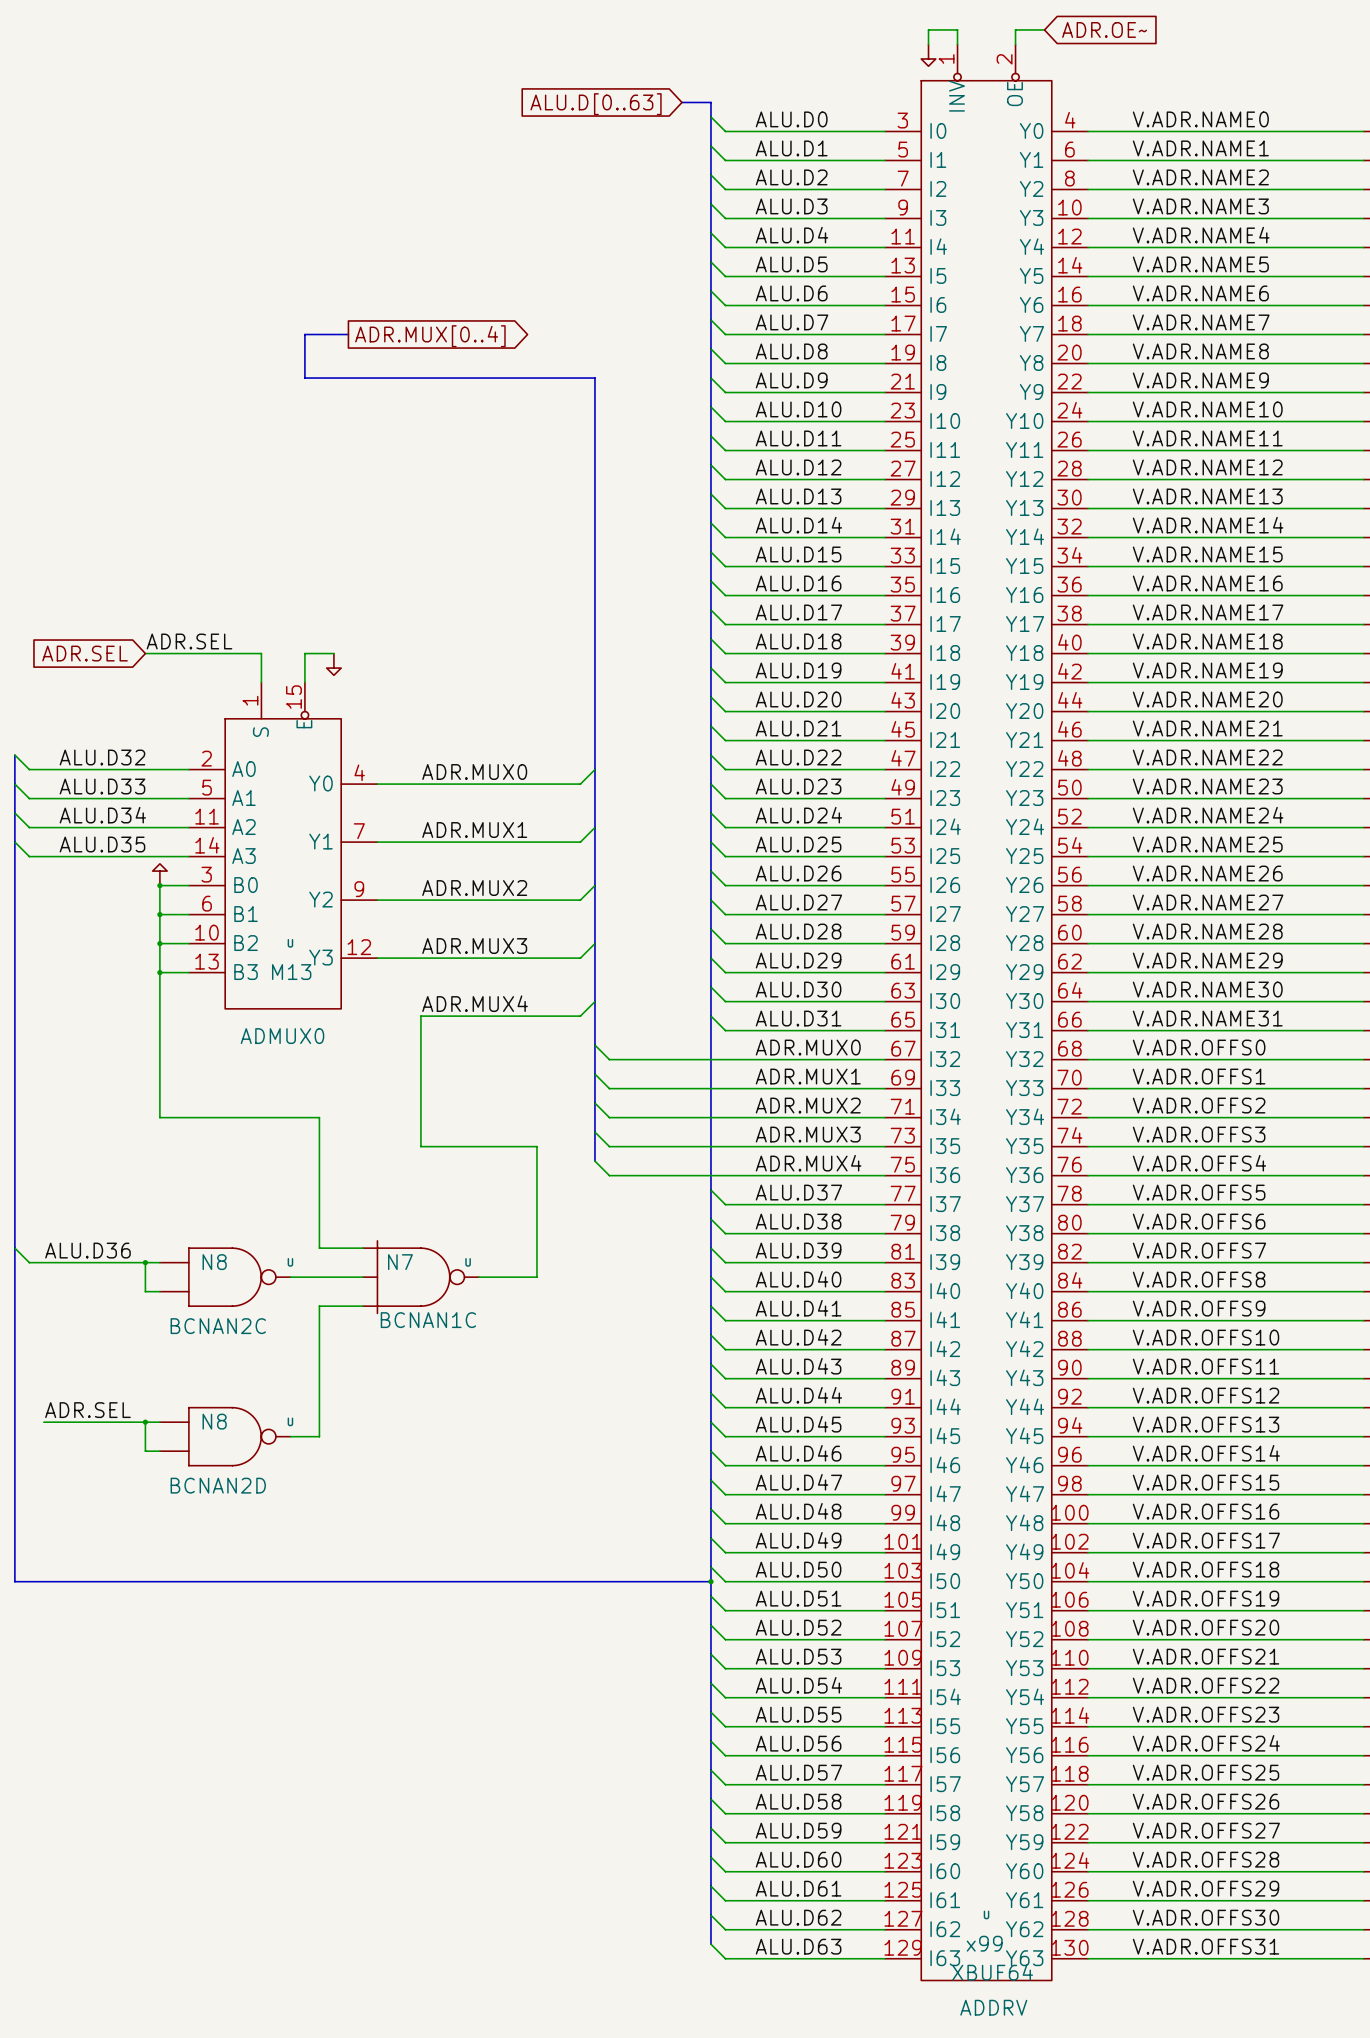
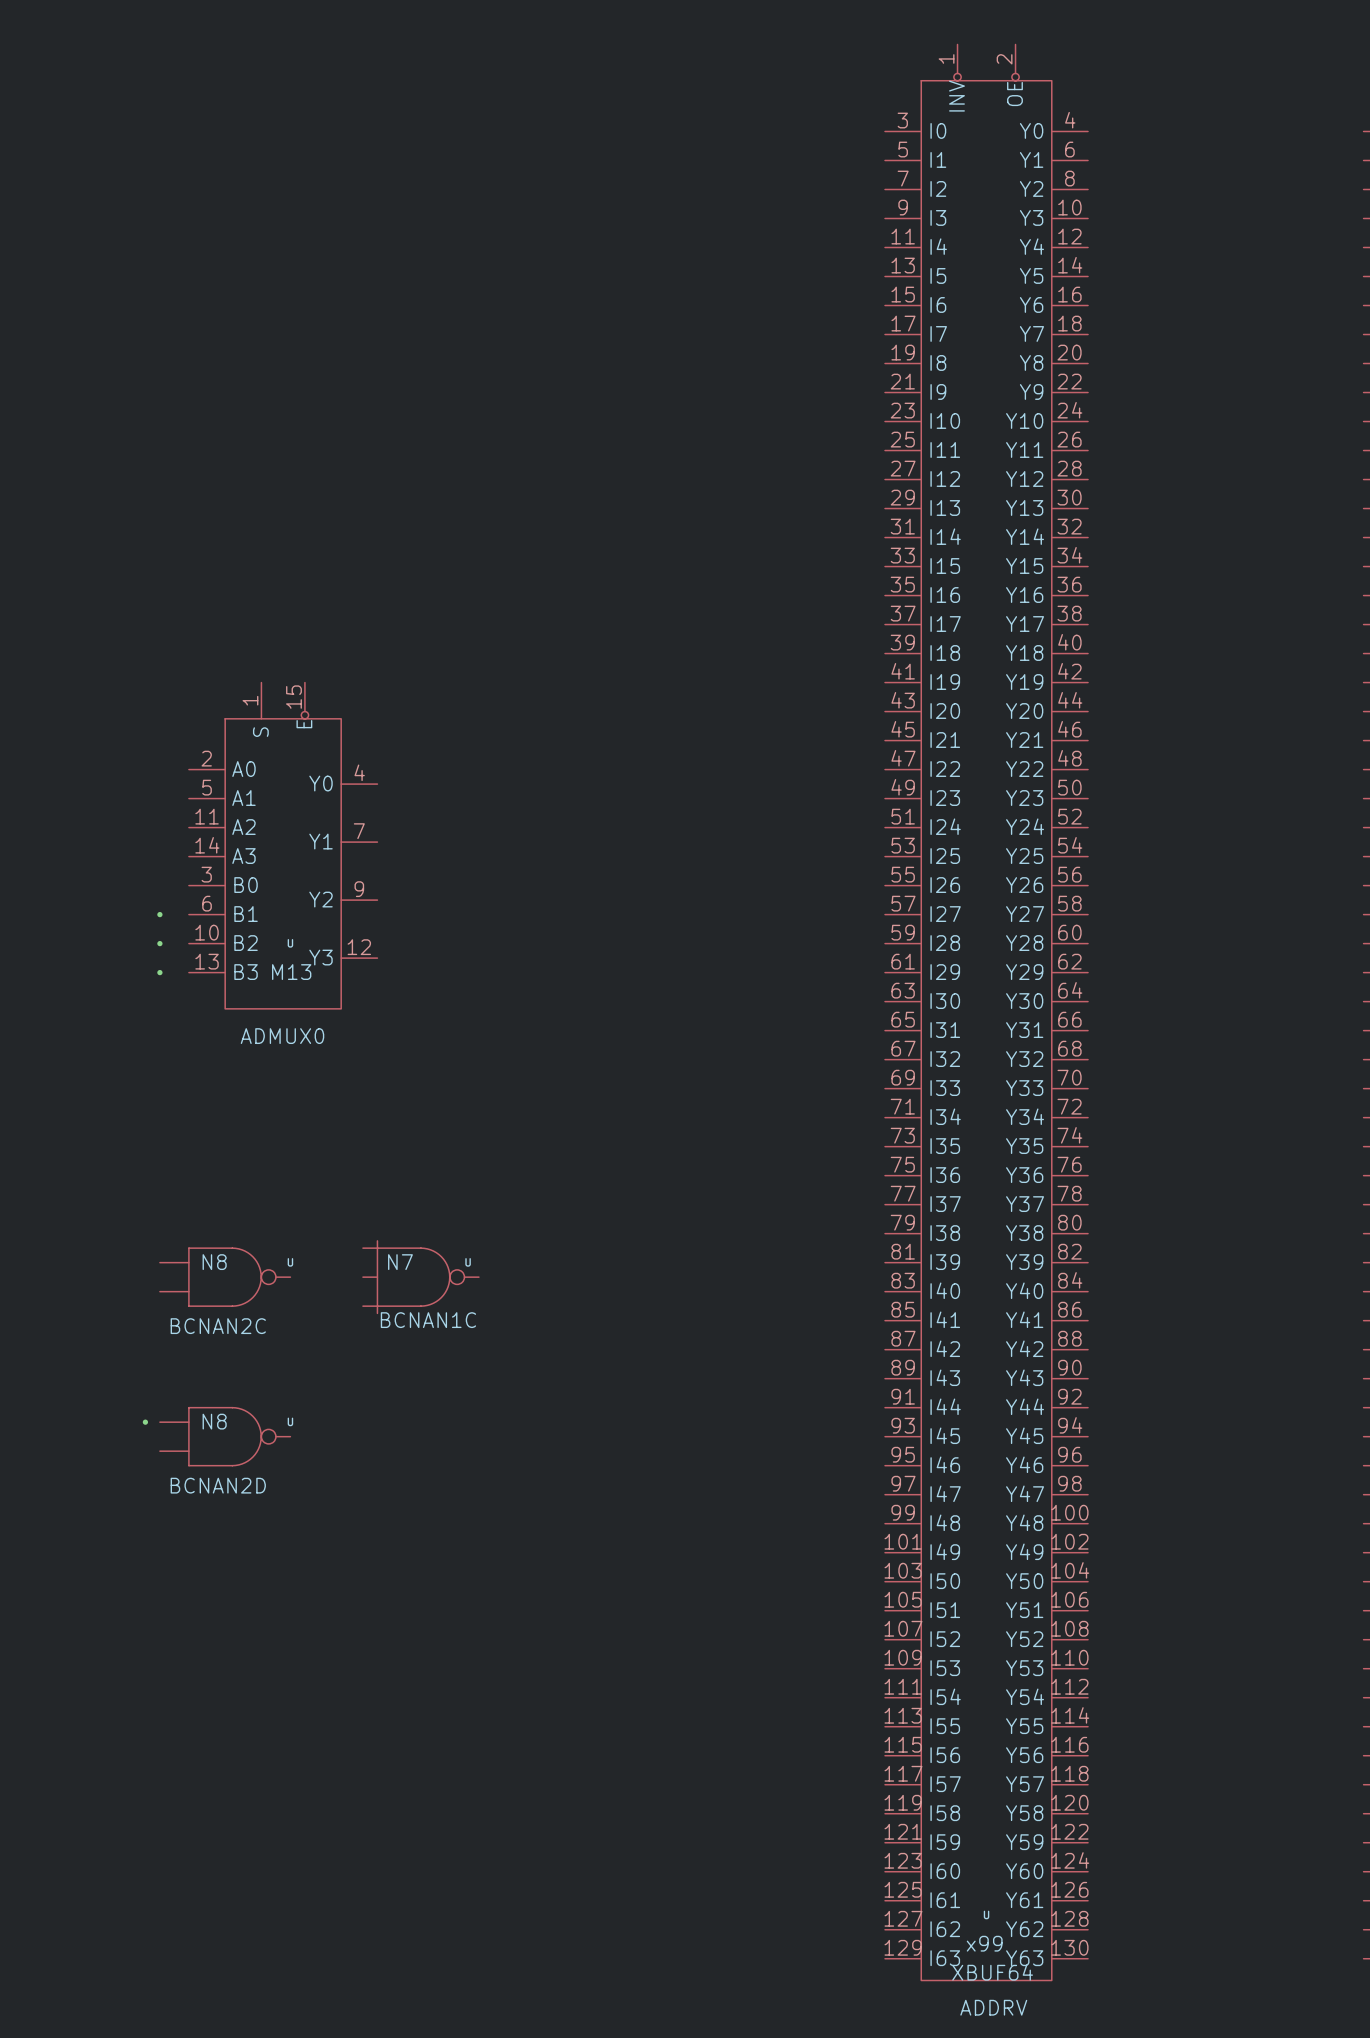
wire: (1044, 29) (1015, 29) (1015, 44) -> none
global label: ADR.OE~ (1104, 29) -> none
wire: (928, 44) (928, 29) (957, 29) (957, 44) -> none
power symbol: (928, 55) -> none
bus: (681, 102) (710, 102) (710, 1944) -> none
global label: ALU.D[0..63] (596, 104) -> none
wire: (710, 116) (725, 131) (885, 131) -> none
label: ALU.D0 (791, 119) -> none
label: V.ADR.NAME0 (1200, 119) -> none
wire: (1088, 131) (1363, 131) -> none
wire: (710, 145) (725, 160) (885, 160) -> none
label: ALU.D1 (791, 148) -> none
label: V.ADR.NAME1 (1200, 148) -> none
wire: (1088, 160) (1363, 160) -> none
wire: (710, 174) (725, 189) (885, 189) -> none
label: ALU.D2 (791, 177) -> none
label: V.ADR.NAME2 (1200, 177) -> none
wire: (1088, 189) (1363, 189) -> none
wire: (710, 204) (725, 218) (885, 218) -> none
label: ALU.D3 (791, 206) -> none
label: V.ADR.NAME3 (1200, 206) -> none
wire: (1088, 218) (1363, 218) -> none
wire: (710, 233) (725, 247) (885, 247) -> none
label: ALU.D4 (792, 235) -> none
label: V.ADR.NAME4 (1201, 235) -> none
wire: (1088, 247) (1363, 247) -> none
wire: (710, 262) (725, 276) (885, 276) -> none
label: ALU.D5 (791, 264) -> none
label: V.ADR.NAME5 (1200, 264) -> none
wire: (1088, 276) (1363, 276) -> none
wire: (710, 291) (725, 305) (885, 305) -> none
label: ALU.D6 (791, 293) -> none
label: V.ADR.NAME6 (1200, 293) -> none
wire: (1088, 305) (1363, 305) -> none
wire: (710, 320) (725, 334) (885, 334) -> none
label: ALU.D7 (792, 322) -> none
label: V.ADR.NAME7 (1201, 322) -> none
bus: (348, 334) (304, 334) (304, 378) (594, 378) (594, 1161) -> none
wire: (1088, 334) (1363, 334) -> none
global label: ADR.MUX[0..4] (430, 336) -> none
wire: (710, 349) (725, 363) (885, 363) -> none
label: ALU.D8 (791, 351) -> none
label: V.ADR.NAME8 (1200, 351) -> none
wire: (1088, 363) (1363, 363) -> none
wire: (710, 378) (725, 392) (885, 392) -> none
label: ALU.D9 (791, 380) -> none
label: V.ADR.NAME9 (1200, 380) -> none
wire: (1088, 392) (1363, 392) -> none
wire: (710, 407) (725, 421) (885, 421) -> none
label: ALU.D10 (798, 409) -> none
label: V.ADR.NAME10 (1207, 409) -> none
wire: (1088, 421) (1363, 421) -> none
wire: (710, 436) (725, 450) (885, 450) -> none
label: ALU.D11 (798, 438) -> none
label: V.ADR.NAME11 (1207, 438) -> none
wire: (1088, 450) (1363, 450) -> none
wire: (710, 465) (725, 479) (885, 479) -> none
label: ALU.D12 (798, 467) -> none
label: V.ADR.NAME12 (1207, 467) -> none
wire: (1088, 479) (1363, 479) -> none
wire: (710, 494) (725, 508) (885, 508) -> none
label: ALU.D13 (798, 496) -> none
label: V.ADR.NAME13 (1207, 496) -> none
wire: (1088, 508) (1363, 508) -> none
wire: (710, 523) (725, 537) (885, 537) -> none
label: ALU.D14 (798, 525) -> none
label: V.ADR.NAME14 (1208, 525) -> none
wire: (1088, 537) (1363, 537) -> none
wire: (710, 552) (725, 566) (885, 566) -> none
label: ALU.D15 (798, 554) -> none
label: V.ADR.NAME15 (1207, 554) -> none
wire: (1088, 566) (1363, 566) -> none
wire: (710, 581) (725, 595) (885, 595) -> none
label: ALU.D16 (798, 583) -> none
label: V.ADR.NAME16 (1207, 583) -> none
wire: (1088, 595) (1363, 595) -> none
wire: (710, 610) (725, 624) (885, 624) -> none
label: ALU.D17 (798, 612) -> none
label: V.ADR.NAME17 (1208, 612) -> none
wire: (1088, 624) (1363, 624) -> none
wire: (710, 639) (725, 653) (885, 653) -> none
label: ADR.SEL (189, 641) -> none
label: ALU.D18 (798, 641) -> none
label: V.ADR.NAME18 (1207, 641) -> none
global label: ADR.SEL (85, 653) -> none
wire: (145, 653) (261, 653) (261, 682) -> none
wire: (333, 653) (304, 653) (304, 682) -> none
wire: (1088, 653) (1363, 653) -> none
power symbol: (333, 664) -> none
wire: (710, 668) (725, 682) (885, 682) -> none
label: ALU.D19 (798, 670) -> none
label: V.ADR.NAME19 (1207, 670) -> none
wire: (1088, 682) (1363, 682) -> none
wire: (710, 697) (725, 711) (885, 711) -> none
label: ALU.D20 (798, 699) -> none
label: V.ADR.NAME20 (1207, 699) -> none
wire: (1088, 711) (1363, 711) -> none
wire: (710, 726) (725, 740) (885, 740) -> none
label: ALU.D21 (798, 728) -> none
label: V.ADR.NAME21 (1207, 728) -> none
wire: (1088, 740) (1363, 740) -> none
wire: (14, 755) (29, 769) (188, 769) -> none
bus: (14, 755) (14, 1581) (710, 1581) -> none
wire: (710, 755) (725, 769) (885, 769) -> none
label: ALU.D32 (102, 757) -> none
label: ALU.D22 (798, 757) -> none
label: V.ADR.NAME22 (1207, 757) -> none
wire: (594, 769) (580, 784) (377, 784) -> none
wire: (1088, 769) (1363, 769) -> none
label: ADR.MUX0 (474, 772) -> none
wire: (14, 784) (29, 798) (188, 798) -> none
wire: (710, 784) (725, 798) (885, 798) -> none
label: ALU.D33 (102, 786) -> none
label: ALU.D23 (798, 786) -> none
label: V.ADR.NAME23 (1207, 786) -> none
wire: (1088, 798) (1363, 798) -> none
wire: (14, 813) (29, 827) (188, 827) -> none
wire: (710, 813) (725, 827) (885, 827) -> none
label: ALU.D34 (102, 815) -> none
label: ALU.D24 (798, 815) -> none
label: V.ADR.NAME24 (1208, 815) -> none
wire: (594, 827) (580, 842) (377, 842) -> none
wire: (1088, 827) (1363, 827) -> none
label: ADR.MUX1 (474, 830) -> none
wire: (14, 842) (29, 856) (188, 856) -> none
wire: (710, 842) (725, 856) (885, 856) -> none
label: ALU.D35 (102, 844) -> none
label: ALU.D25 (798, 844) -> none
label: V.ADR.NAME25 (1207, 844) -> none
wire: (1088, 856) (1363, 856) -> none
wire: (710, 871) (725, 885) (885, 885) -> none
label: ALU.D26 (798, 873) -> none
label: V.ADR.NAME26 (1207, 873) -> none
power symbol: (159, 874) -> none
junction: (159, 885) -> none
wire: (188, 885) (159, 885) (159, 1117) (319, 1117) (319, 1248) (362, 1248) -> none
wire: (594, 885) (580, 900) (377, 900) -> none
wire: (1088, 885) (1363, 885) -> none
label: ADR.MUX2 (474, 888) -> none
wire: (710, 900) (725, 914) (885, 914) -> none
label: ALU.D27 (798, 902) -> none
label: V.ADR.NAME27 (1208, 902) -> none
wire: (159, 914) (188, 914) -> none
wire: (1088, 914) (1363, 914) -> none
wire: (710, 929) (725, 943) (885, 943) -> none
label: ALU.D28 (798, 931) -> none
label: V.ADR.NAME28 (1207, 931) -> none
wire: (159, 943) (188, 943) -> none
wire: (594, 943) (580, 958) (377, 958) -> none
wire: (1088, 943) (1363, 943) -> none
label: ADR.MUX3 (474, 946) -> none
wire: (710, 958) (725, 972) (885, 972) -> none
label: ALU.D29 (798, 960) -> none
label: V.ADR.NAME29 (1207, 960) -> none
wire: (159, 972) (188, 972) -> none
wire: (1088, 972) (1363, 972) -> none
wire: (710, 987) (725, 1001) (885, 1001) -> none
label: ALU.D30 (798, 989) -> none
label: V.ADR.NAME30 (1207, 989) -> none
wire: (594, 1001) (580, 1016) (420, 1016) (420, 1146) (536, 1146) (536, 1277) (478, 1277) -> none
wire: (1088, 1001) (1363, 1001) -> none
label: ADR.MUX4 (475, 1003) -> none
wire: (710, 1016) (725, 1030) (885, 1030) -> none
label: ALU.D31 (798, 1018) -> none
label: V.ADR.NAME31 (1207, 1018) -> none
wire: (1088, 1030) (1363, 1030) -> none
wire: (594, 1045) (609, 1059) (885, 1059) -> none
label: ADR.MUX0 (808, 1047) -> none
label: V.ADR.OFFS0 (1199, 1047) -> none
wire: (1088, 1059) (1363, 1059) -> none
wire: (594, 1074) (609, 1088) (885, 1088) -> none
label: ADR.MUX1 (808, 1076) -> none
label: V.ADR.OFFS1 (1199, 1076) -> none
wire: (1088, 1088) (1363, 1088) -> none
wire: (594, 1103) (609, 1117) (885, 1117) -> none
label: ADR.MUX2 (808, 1105) -> none
label: V.ADR.OFFS2 (1199, 1105) -> none
wire: (1088, 1117) (1363, 1117) -> none
wire: (594, 1132) (609, 1146) (885, 1146) -> none
label: ADR.MUX3 (808, 1134) -> none
label: V.ADR.OFFS3 (1199, 1134) -> none
wire: (1088, 1146) (1363, 1146) -> none
wire: (594, 1161) (609, 1175) (885, 1175) -> none
label: ADR.MUX4 (808, 1163) -> none
label: V.ADR.OFFS4 (1199, 1163) -> none
wire: (1088, 1175) (1363, 1175) -> none
wire: (710, 1190) (725, 1204) (885, 1204) -> none
label: ALU.D37 (798, 1192) -> none
label: V.ADR.OFFS5 (1199, 1192) -> none
wire: (1088, 1204) (1363, 1204) -> none
wire: (710, 1219) (725, 1233) (885, 1233) -> none
label: ALU.D38 (798, 1221) -> none
label: V.ADR.OFFS6 (1199, 1221) -> none
wire: (1088, 1233) (1363, 1233) -> none
wire: (14, 1248) (29, 1262) (159, 1262) -> none
wire: (710, 1248) (725, 1262) (885, 1262) -> none
label: ALU.D36 (87, 1250) -> none
label: ALU.D39 (798, 1250) -> none
label: V.ADR.OFFS7 (1199, 1250) -> none
wire: (145, 1262) (145, 1291) (159, 1291) -> none
junction: (145, 1262) -> none
wire: (1088, 1262) (1363, 1262) -> none
wire: (290, 1277) (362, 1277) -> none
wire: (710, 1277) (725, 1291) (885, 1291) -> none
label: ALU.D40 (798, 1279) -> none
label: V.ADR.OFFS8 (1199, 1279) -> none
wire: (1088, 1291) (1363, 1291) -> none
wire: (362, 1306) (319, 1306) (319, 1436) (290, 1436) -> none
wire: (710, 1306) (725, 1320) (885, 1320) -> none
label: ALU.D41 (798, 1308) -> none
label: V.ADR.OFFS9 (1199, 1308) -> none
wire: (1088, 1320) (1363, 1320) -> none
wire: (710, 1335) (725, 1349) (885, 1349) -> none
label: ALU.D42 (798, 1337) -> none
label: V.ADR.OFFS10 (1206, 1337) -> none
wire: (1088, 1349) (1363, 1349) -> none
wire: (710, 1364) (725, 1378) (885, 1378) -> none
label: ALU.D43 (798, 1366) -> none
label: V.ADR.OFFS11 (1206, 1366) -> none
wire: (1088, 1378) (1363, 1378) -> none
wire: (710, 1393) (725, 1407) (885, 1407) -> none
label: ALU.D44 (798, 1395) -> none
label: V.ADR.OFFS12 (1206, 1395) -> none
wire: (1088, 1407) (1363, 1407) -> none
label: ADR.SEL (87, 1410) -> none
wire: (43, 1422) (159, 1422) -> none
wire: (145, 1422) (145, 1451) (159, 1451) -> none
wire: (710, 1422) (725, 1436) (885, 1436) -> none
label: ALU.D45 (798, 1424) -> none
label: V.ADR.OFFS13 (1206, 1424) -> none
wire: (1088, 1436) (1363, 1436) -> none
wire: (710, 1451) (725, 1465) (885, 1465) -> none
label: ALU.D46 (798, 1453) -> none
label: V.ADR.OFFS14 (1206, 1453) -> none
wire: (1088, 1465) (1363, 1465) -> none
wire: (710, 1480) (725, 1494) (885, 1494) -> none
label: ALU.D47 (798, 1482) -> none
label: V.ADR.OFFS15 (1206, 1482) -> none
wire: (1088, 1494) (1363, 1494) -> none
wire: (710, 1509) (725, 1523) (885, 1523) -> none
label: ALU.D48 (798, 1511) -> none
label: V.ADR.OFFS16 (1206, 1511) -> none
wire: (1088, 1523) (1363, 1523) -> none
wire: (710, 1538) (725, 1552) (885, 1552) -> none
label: ALU.D49 (798, 1540) -> none
label: V.ADR.OFFS17 (1206, 1540) -> none
wire: (1088, 1552) (1363, 1552) -> none
wire: (710, 1567) (725, 1581) (885, 1581) -> none
label: ALU.D50 (798, 1569) -> none
label: V.ADR.OFFS18 (1206, 1569) -> none
junction: (710, 1581) -> none
wire: (1088, 1581) (1363, 1581) -> none
wire: (710, 1596) (725, 1610) (885, 1610) -> none
label: ALU.D51 (798, 1598) -> none
label: V.ADR.OFFS19 (1206, 1598) -> none
wire: (1088, 1610) (1363, 1610) -> none
wire: (710, 1625) (725, 1639) (885, 1639) -> none
label: ALU.D52 (798, 1627) -> none
label: V.ADR.OFFS20 (1206, 1627) -> none
wire: (1088, 1639) (1363, 1639) -> none
wire: (710, 1654) (725, 1668) (885, 1668) -> none
label: ALU.D53 (798, 1656) -> none
label: V.ADR.OFFS21 (1206, 1656) -> none
wire: (1088, 1668) (1363, 1668) -> none
wire: (710, 1683) (725, 1697) (885, 1697) -> none
label: ALU.D54 (798, 1685) -> none
label: V.ADR.OFFS22 (1206, 1685) -> none
wire: (1088, 1697) (1363, 1697) -> none
wire: (710, 1712) (725, 1726) (885, 1726) -> none
label: ALU.D55 (798, 1714) -> none
label: V.ADR.OFFS23 (1206, 1714) -> none
wire: (1088, 1726) (1363, 1726) -> none
wire: (710, 1741) (725, 1755) (885, 1755) -> none
label: ALU.D56 (798, 1743) -> none
label: V.ADR.OFFS24 (1206, 1743) -> none
wire: (1088, 1755) (1363, 1755) -> none
wire: (710, 1770) (725, 1784) (885, 1784) -> none
label: ALU.D57 (798, 1772) -> none
label: V.ADR.OFFS25 (1206, 1772) -> none
wire: (1088, 1784) (1363, 1784) -> none
wire: (710, 1799) (725, 1813) (885, 1813) -> none
label: ALU.D58 (798, 1801) -> none
label: V.ADR.OFFS26 (1206, 1801) -> none
wire: (1088, 1813) (1363, 1813) -> none
wire: (710, 1828) (725, 1842) (885, 1842) -> none
label: ALU.D59 (798, 1830) -> none
label: V.ADR.OFFS27 (1206, 1830) -> none
wire: (1088, 1842) (1363, 1842) -> none
wire: (710, 1857) (725, 1871) (885, 1871) -> none
label: ALU.D60 (798, 1859) -> none
label: V.ADR.OFFS28 (1206, 1859) -> none
wire: (1088, 1871) (1363, 1871) -> none
wire: (710, 1886) (725, 1900) (885, 1900) -> none
label: ALU.D61 (798, 1888) -> none
label: V.ADR.OFFS29 (1206, 1888) -> none
wire: (1088, 1900) (1363, 1900) -> none
wire: (710, 1915) (725, 1929) (885, 1929) -> none
label: ALU.D62 (798, 1917) -> none
label: V.ADR.OFFS30 (1206, 1917) -> none
wire: (1088, 1929) (1363, 1929) -> none
wire: (710, 1944) (725, 1958) (885, 1958) -> none
label: ALU.D63 (798, 1946) -> none
label: V.ADR.OFFS31 (1206, 1946) -> none
wire: (1088, 1958) (1363, 1958) -> none

